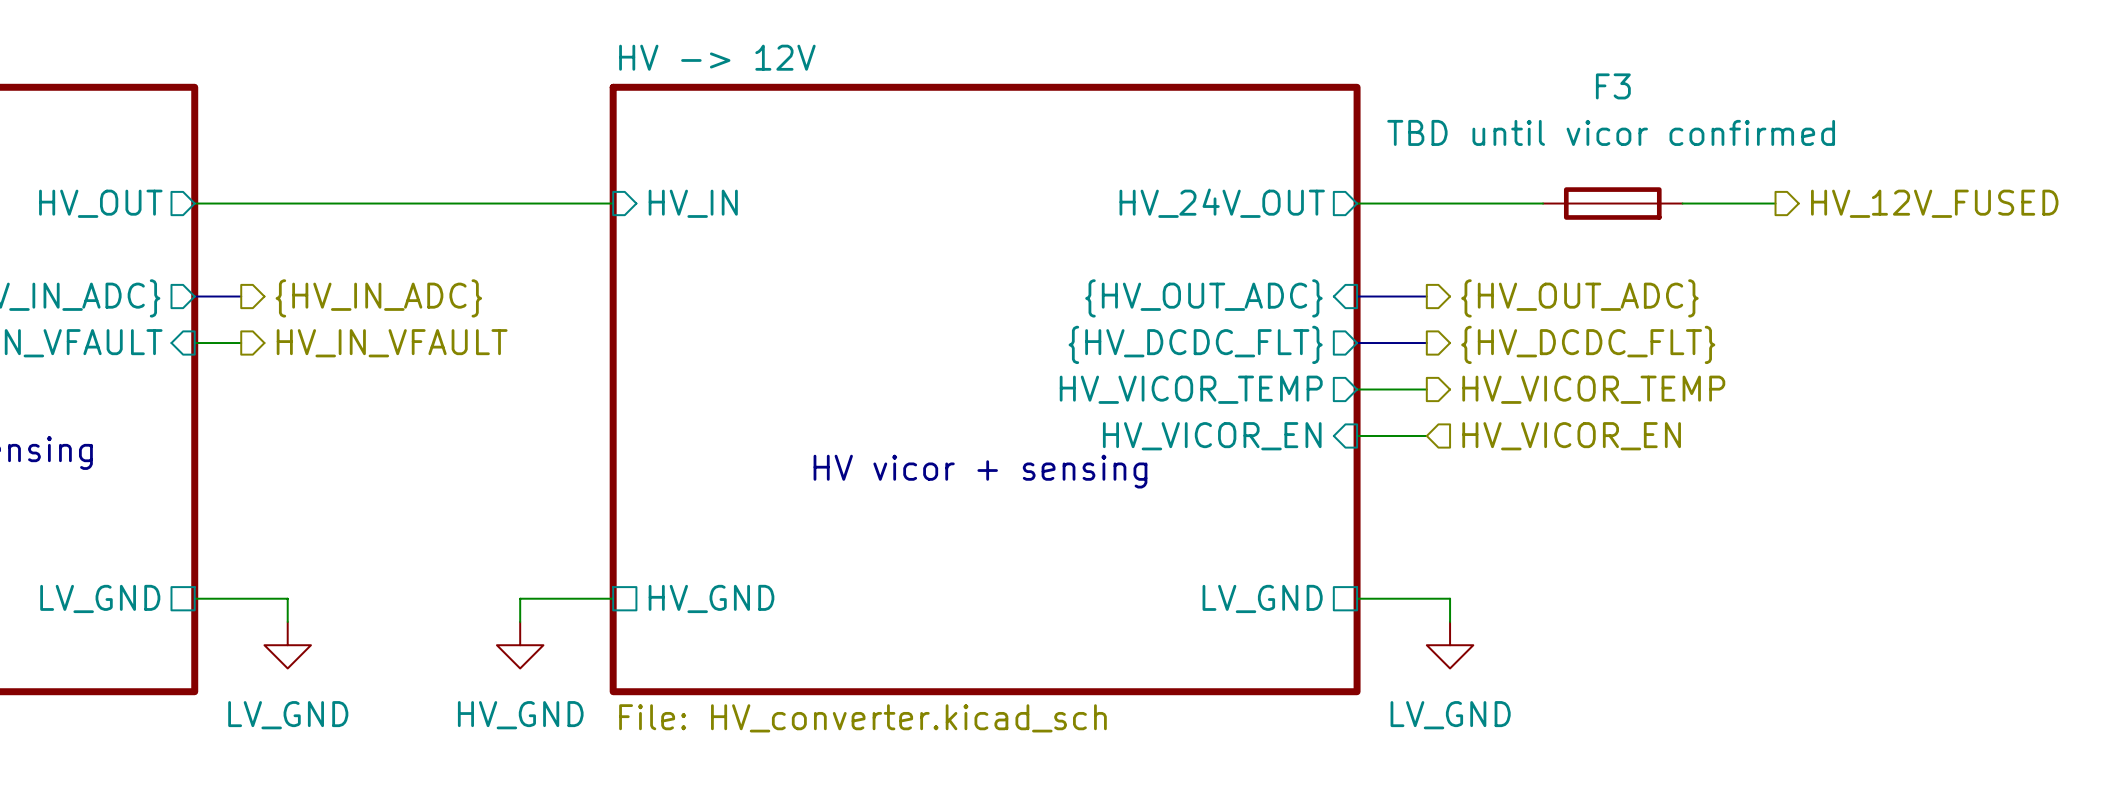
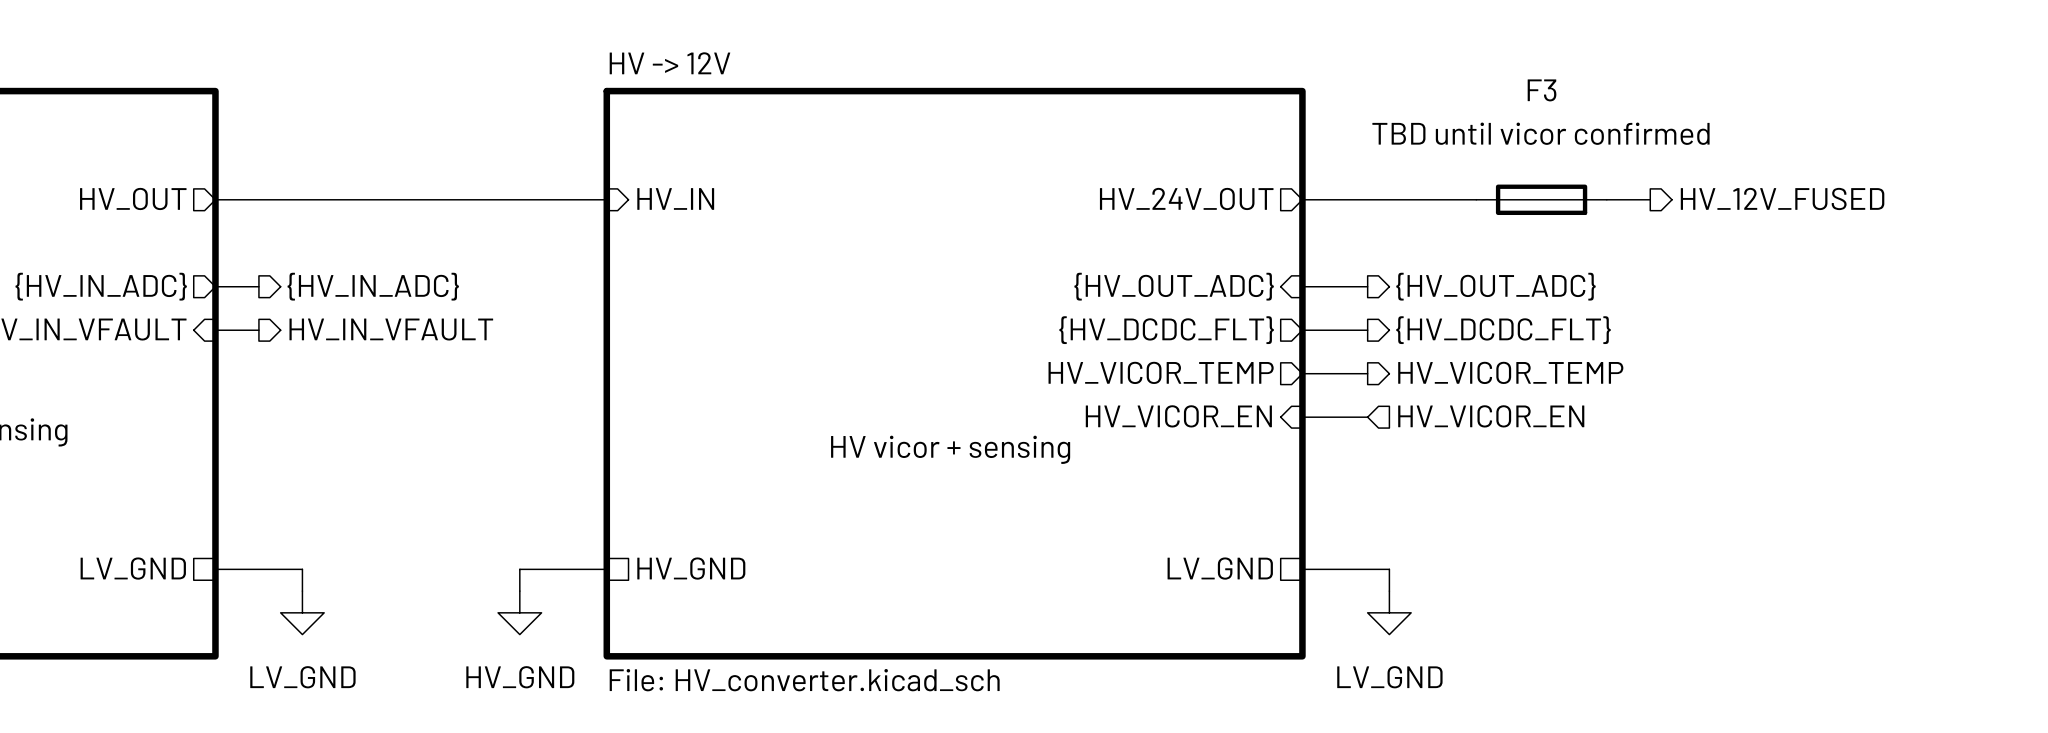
wire: (1729, 203) (1775, 203) -> none
hierarchical label position: HV_12V_FUSED (1934, 203) -> HV_12V_FUSED (1782, 198)

